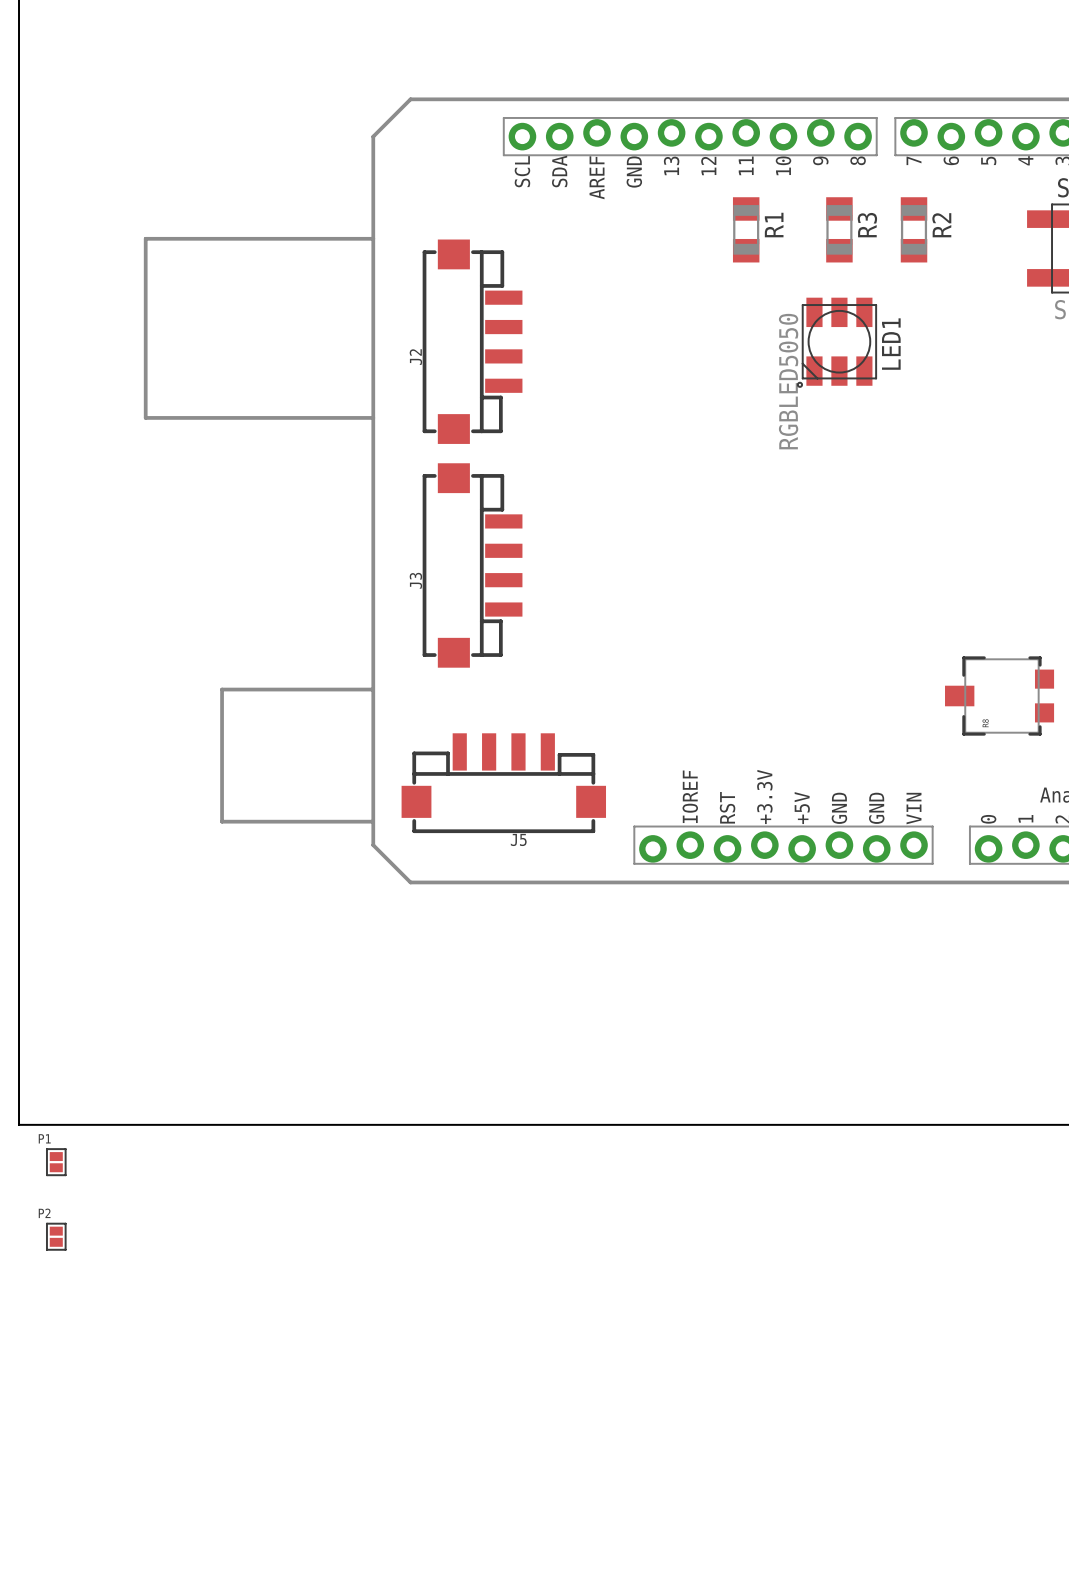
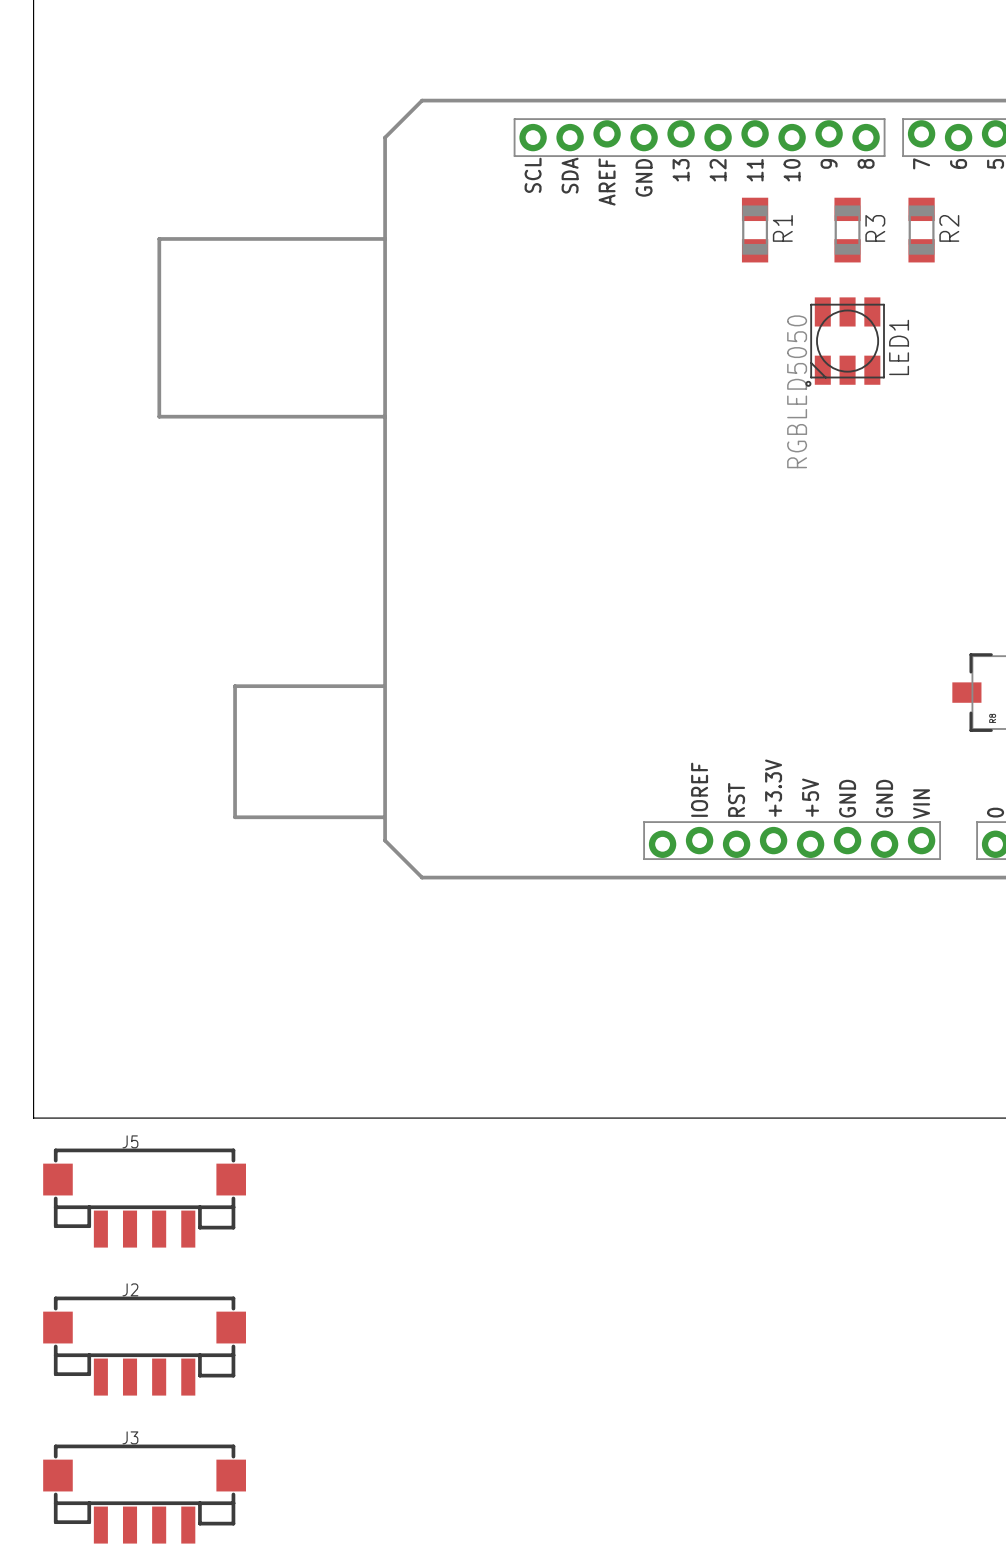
J2 rotation: 0° (472, 341) -> 90° clockwise (144, 1346)
J2 position: (472, 341) -> (144, 1346)
J3 rotation: 0° (472, 565) -> 90° clockwise (144, 1494)
J3 position: (472, 565) -> (144, 1494)
J5 rotation: 0° (503, 783) -> 180° (144, 1198)
J5 position: (503, 783) -> (144, 1198)
P1: (56, 1162) -> none
P2: (56, 1236) -> none

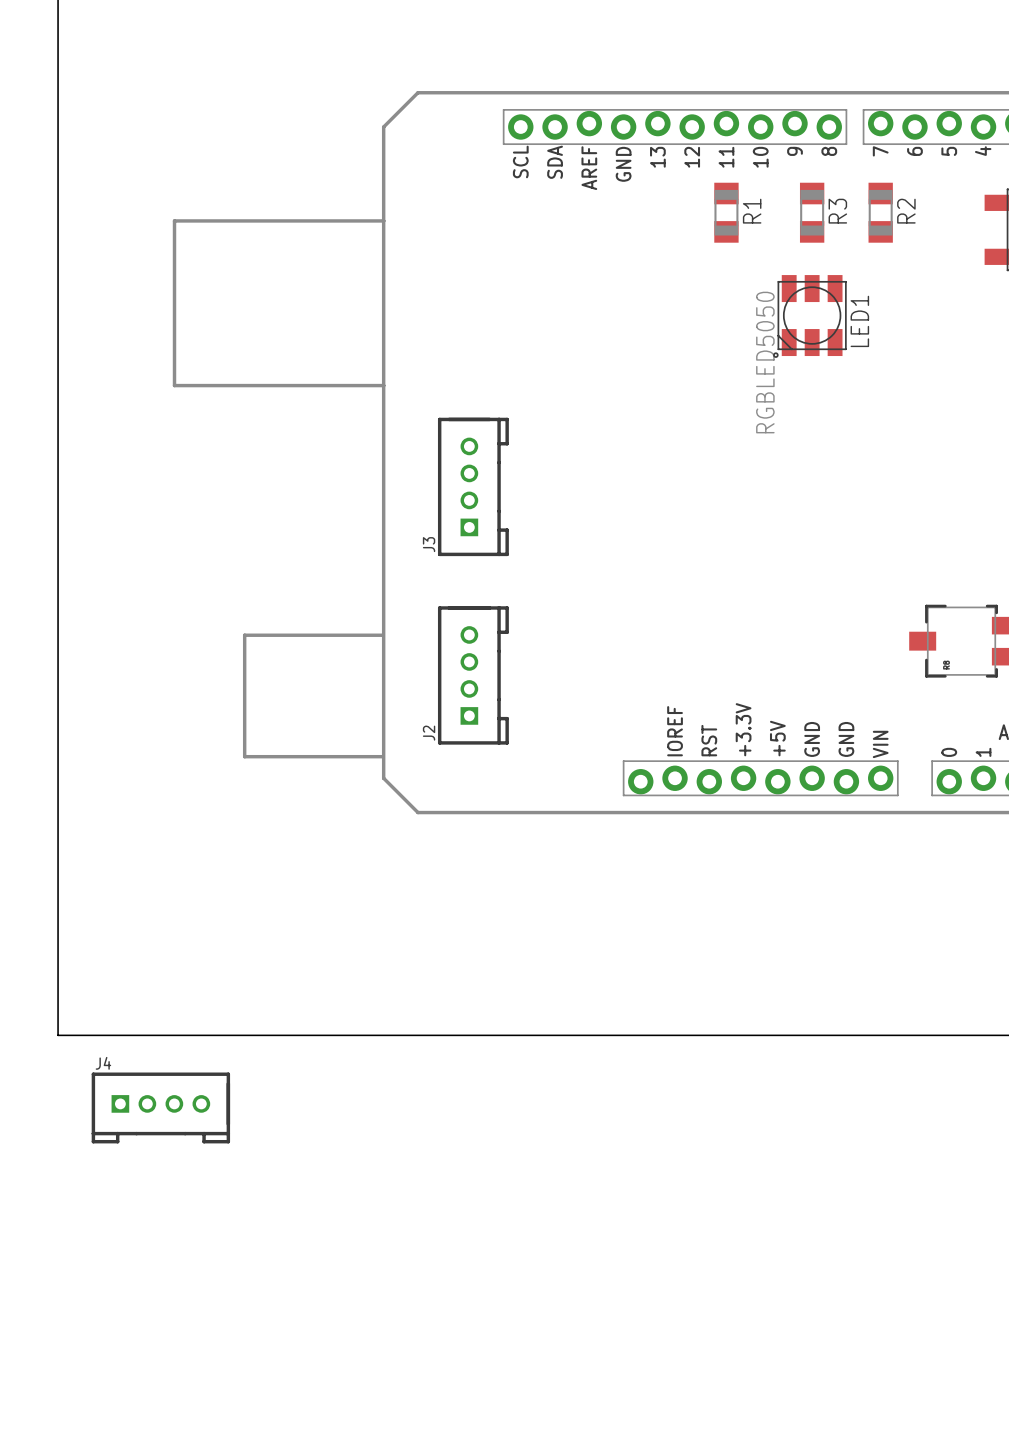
J4: none -> (160, 1107)
J5: (144, 1198) -> none
J2 name position: J2 (130, 1289) -> J2 (429, 733)
J2 footprint: [43, 1296, 247, 1396] -> [437, 606, 509, 745]
J3 name position: J3 (130, 1437) -> J3 (429, 544)
J3 footprint: [43, 1444, 247, 1544] -> [437, 417, 509, 557]

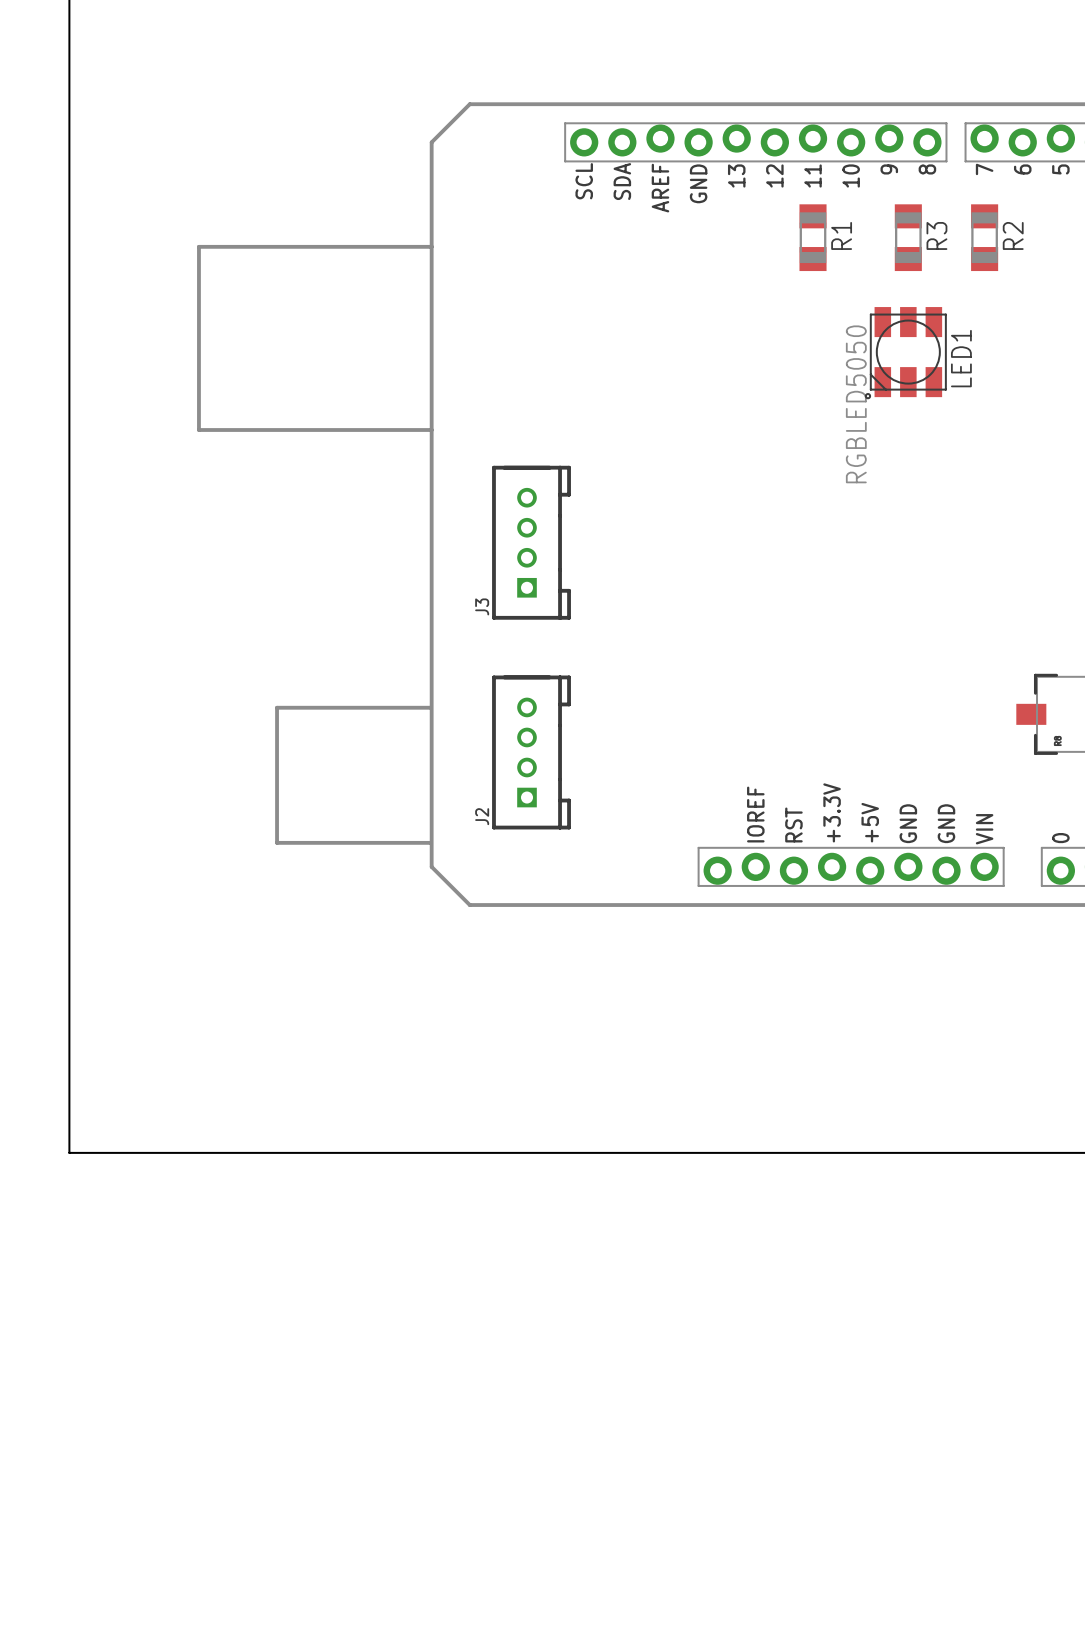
J4: (160, 1107) -> none

